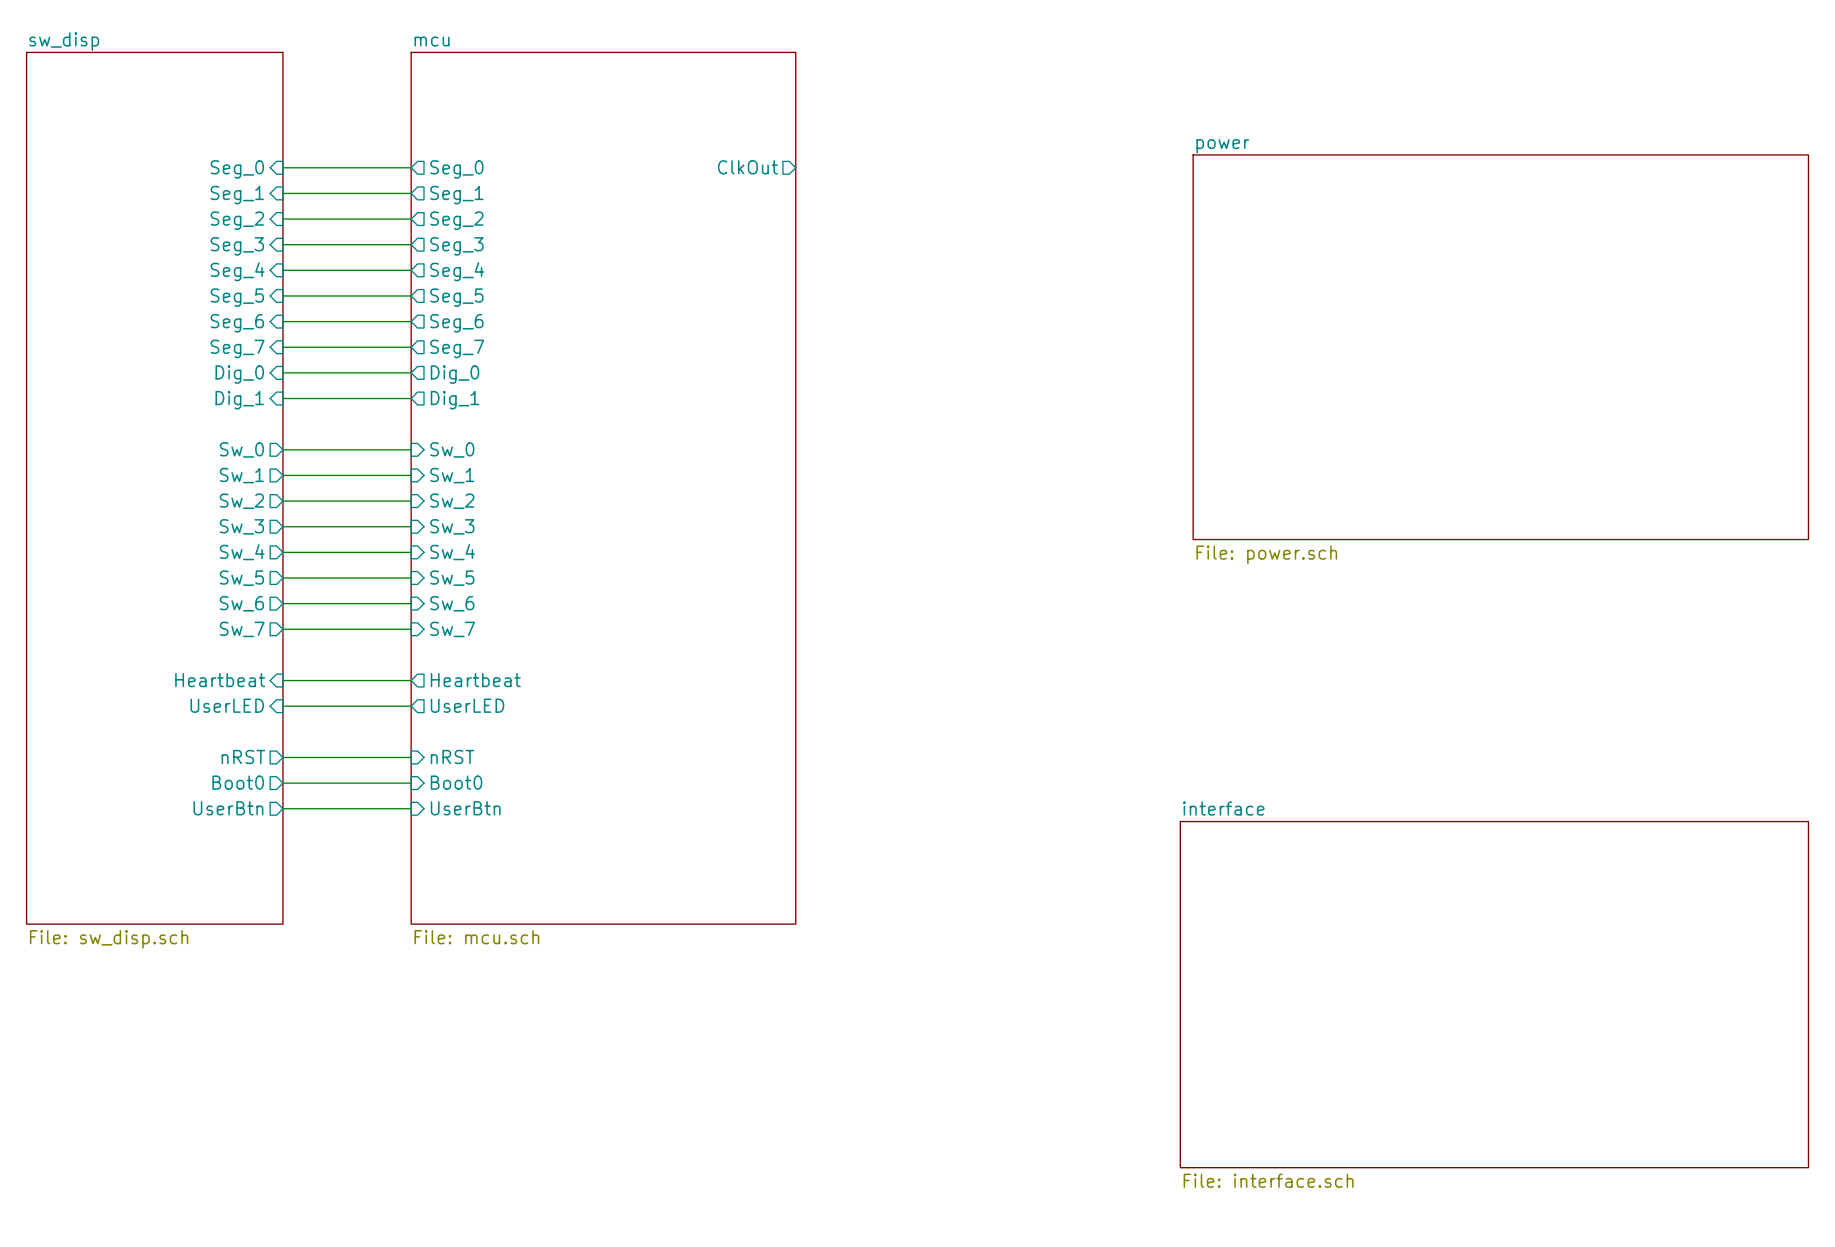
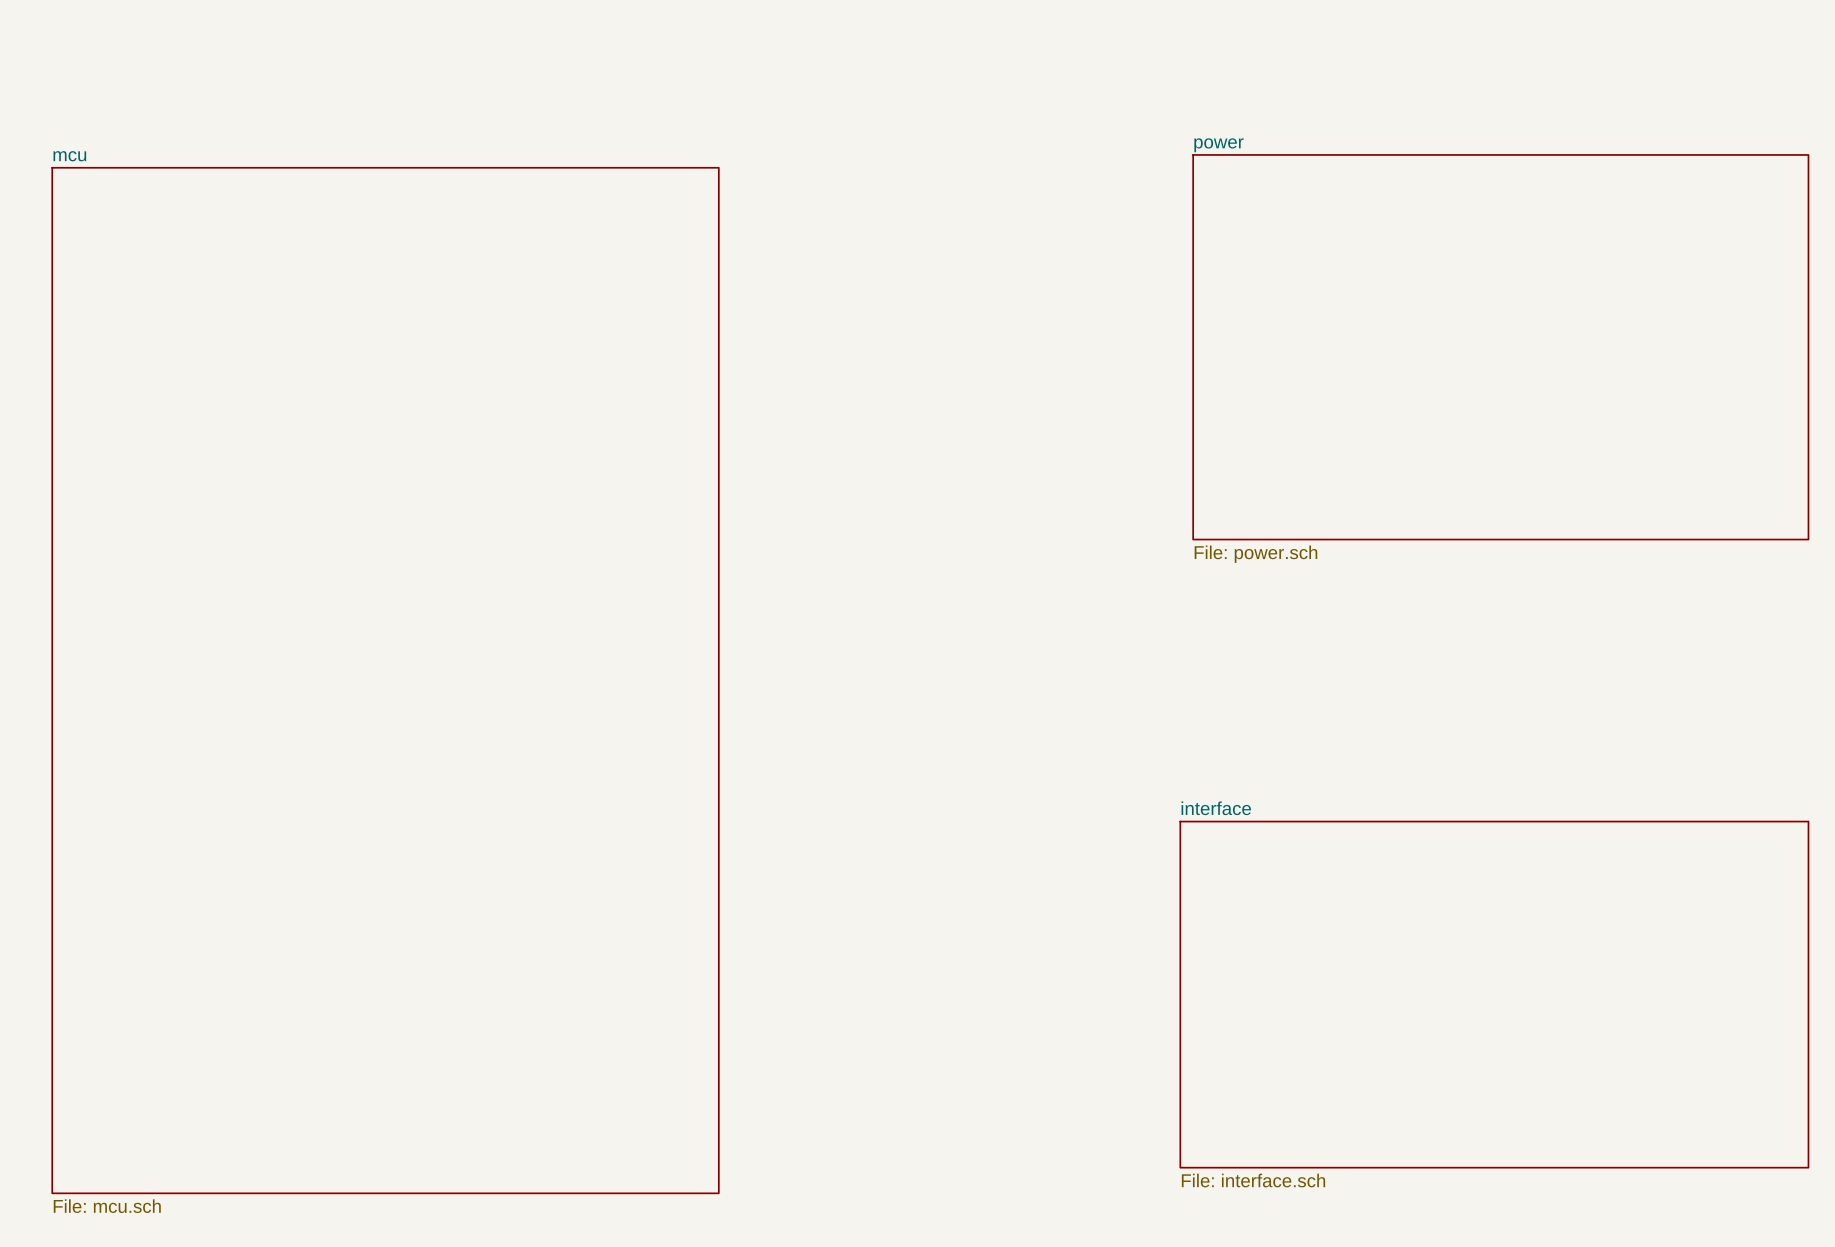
sheet pin: ClkOut (747, 167) -> none
sheet pin: Seg_0 (237, 169) -> none
sheet pin: Seg_0 (456, 169) -> none
wire: (282, 193) (411, 193) -> none
sheet pin: Seg_1 (237, 195) -> none
sheet pin: Seg_1 (456, 195) -> none
wire: (282, 219) (411, 219) -> none
sheet pin: Seg_2 (237, 220) -> none
sheet pin: Seg_2 (456, 220) -> none
wire: (282, 244) (411, 244) -> none
sheet pin: Seg_3 (237, 246) -> none
sheet pin: Seg_3 (456, 246) -> none
wire: (282, 270) (411, 270) -> none
sheet pin: Seg_4 (237, 271) -> none
sheet pin: Seg_4 (457, 271) -> none
wire: (282, 295) (411, 295) -> none
sheet pin: Seg_5 (237, 297) -> none
sheet pin: Seg_5 (456, 297) -> none
wire: (282, 321) (411, 321) -> none
sheet pin: Seg_6 (237, 323) -> none
sheet pin: Seg_6 (456, 323) -> none
wire: (282, 347) (411, 347) -> none
sheet pin: Seg_7 (237, 348) -> none
sheet pin: Seg_7 (457, 348) -> none
wire: (282, 372) (411, 372) -> none
sheet pin: Dig_0 (239, 374) -> none
sheet pin: Dig_0 (455, 374) -> none
wire: (282, 398) (411, 398) -> none
sheet pin: Dig_1 (239, 400) -> none
sheet pin: Dig_1 (455, 400) -> none
sheet pin: Sw_0 (241, 449) -> none
wire: (282, 449) (411, 449) -> none
sheet pin: Sw_0 (452, 449) -> none
sheet pin: Sw_1 (241, 475) -> none
wire: (282, 475) (411, 475) -> none
sheet pin: Sw_1 (452, 475) -> none
sheet sw_disp: File: sw_disp.sch (154, 488) -> none
sheet mcu: File: mcu.sch (603, 488) -> none
sheet pin: Sw_2 (241, 501) -> none
wire: (282, 501) (411, 501) -> none
sheet pin: Sw_2 (452, 501) -> none
sheet pin: Sw_3 (241, 526) -> none
wire: (282, 526) (411, 526) -> none
sheet pin: Sw_3 (452, 526) -> none
sheet pin: Sw_4 (242, 552) -> none
wire: (282, 552) (411, 552) -> none
sheet pin: Sw_4 (452, 552) -> none
sheet pin: Sw_5 (241, 578) -> none
wire: (282, 578) (411, 578) -> none
sheet pin: Sw_5 (452, 578) -> none
sheet pin: Sw_6 (241, 603) -> none
wire: (282, 603) (411, 603) -> none
sheet pin: Sw_6 (452, 603) -> none
sheet pin: Sw_7 (242, 629) -> none
wire: (282, 629) (411, 629) -> none
sheet pin: Sw_7 (452, 629) -> none
sheet pin: Heartbeat (220, 680) -> none
wire: (282, 680) (411, 680) -> none
sheet mcu: none -> File: mcu.sch (385, 680)
sheet pin: Heartbeat (475, 680) -> none
sheet pin: UserLED (227, 705) -> none
sheet pin: UserLED (467, 705) -> none
wire: (282, 706) (411, 706) -> none
sheet pin: nRST (243, 756) -> none
sheet pin: nRST (452, 756) -> none
wire: (282, 757) (411, 757) -> none
sheet pin: Boot0 (238, 782) -> none
sheet pin: Boot0 (456, 782) -> none
wire: (282, 783) (411, 783) -> none
sheet pin: UserBtn (228, 808) -> none
wire: (282, 808) (411, 808) -> none
sheet pin: UserBtn (465, 808) -> none

